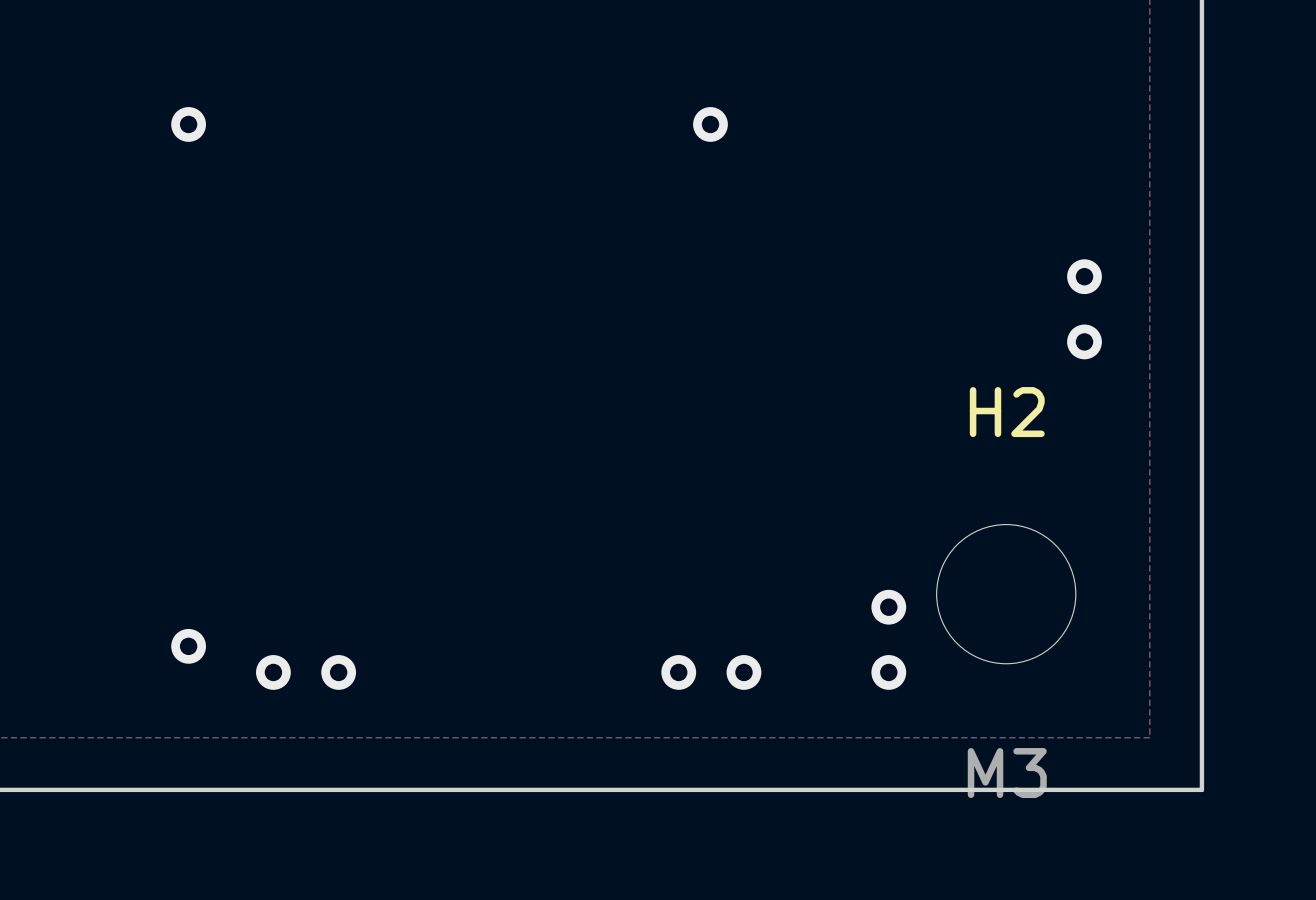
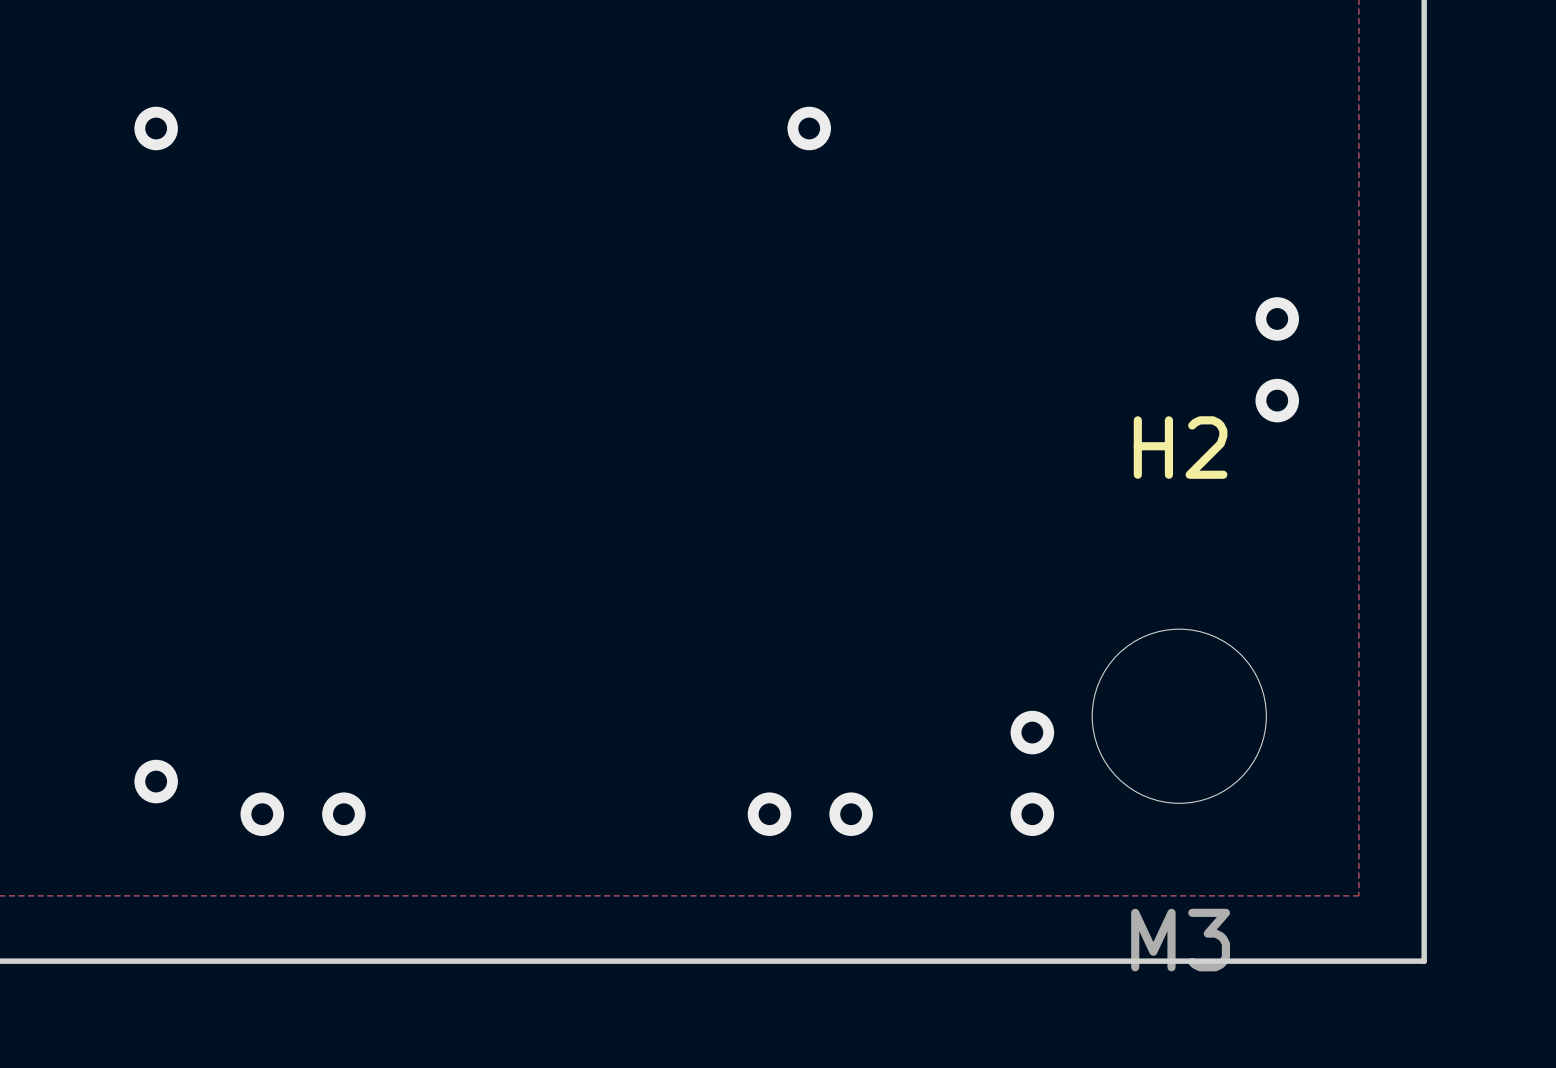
H2 name position: H2 (1007, 412) -> H2 (1180, 447)

